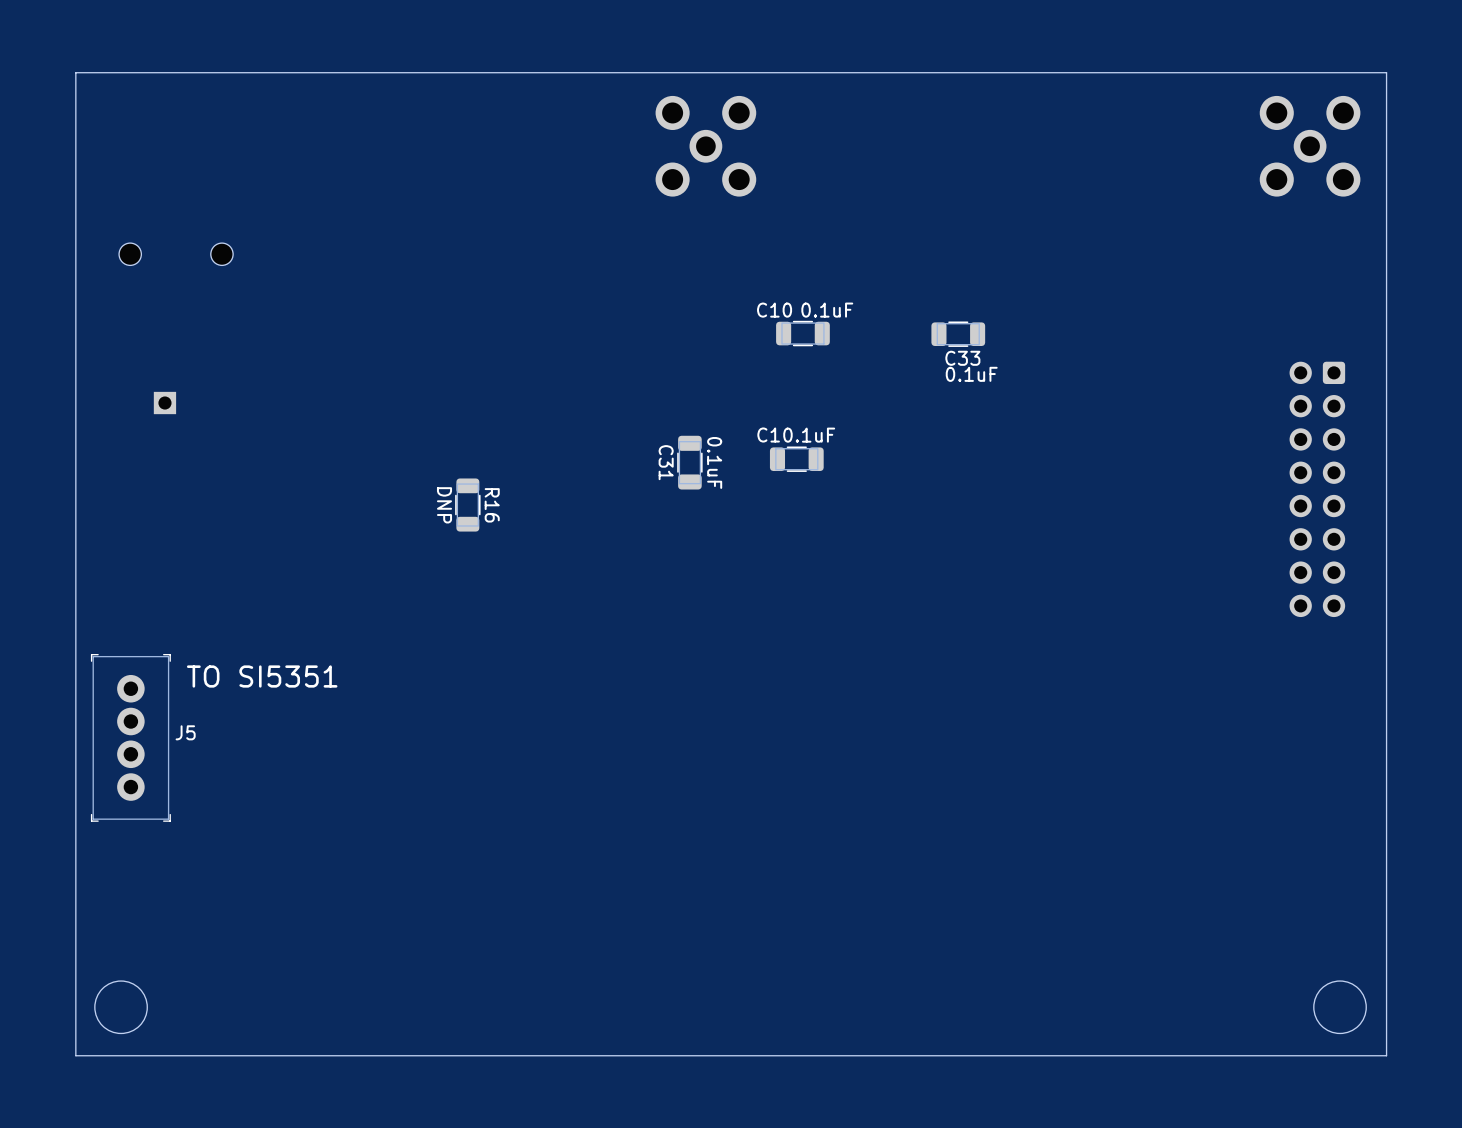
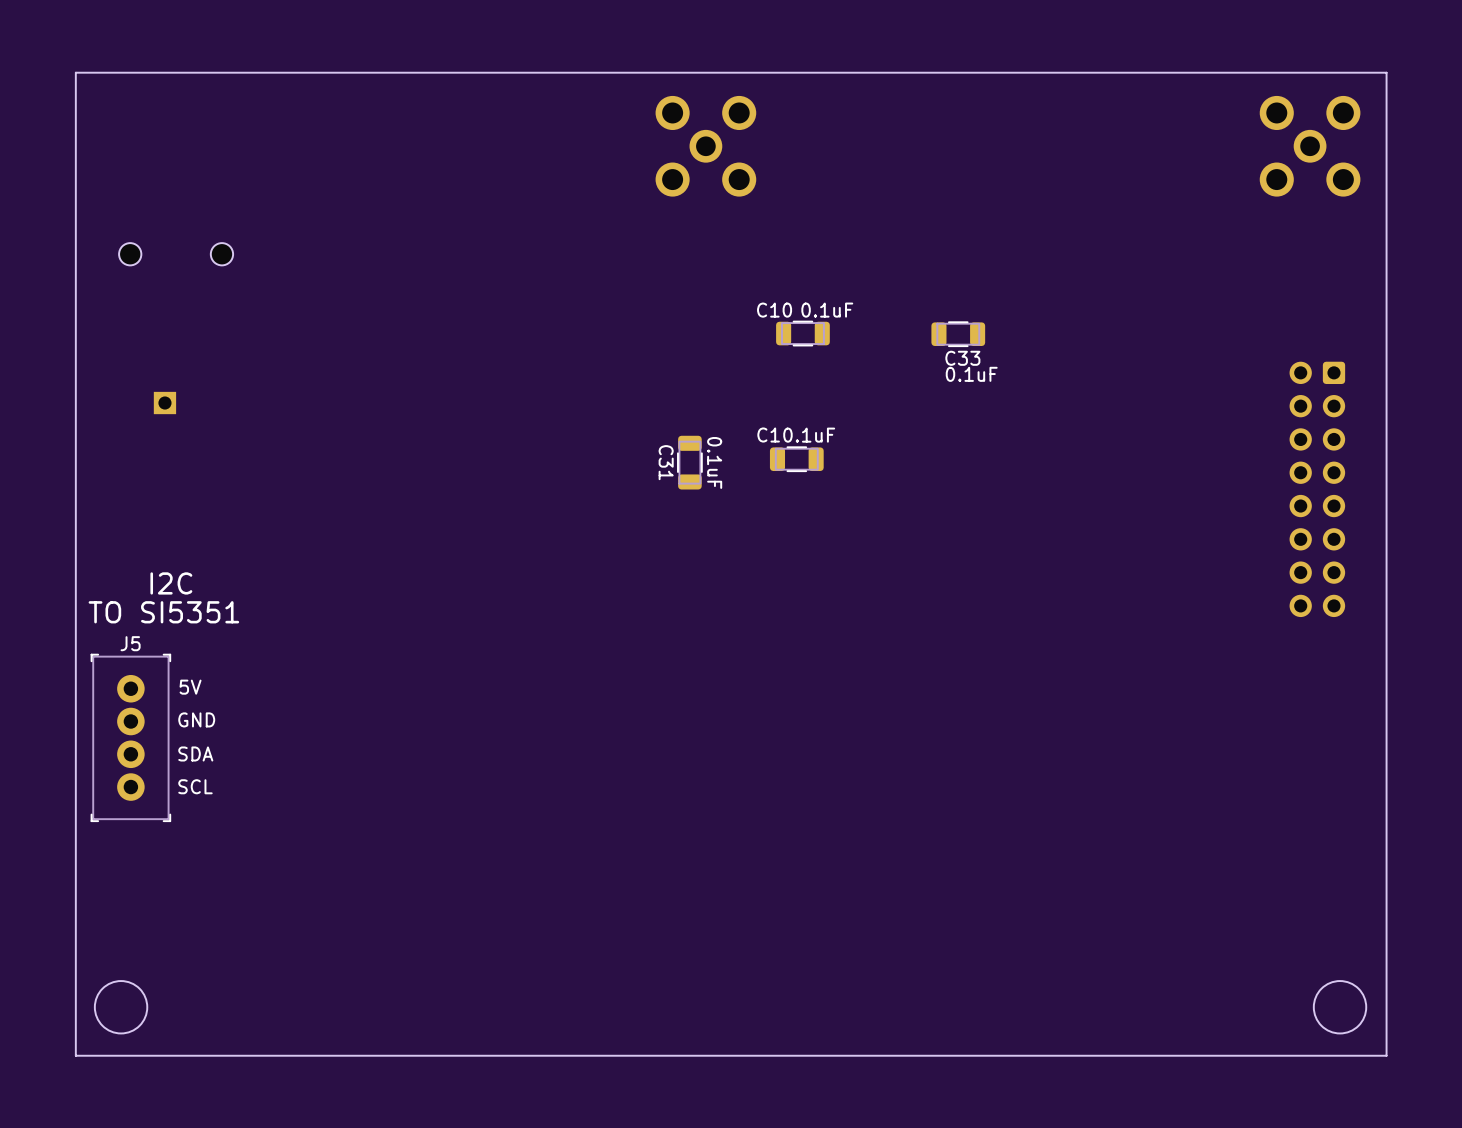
R16: DNP (467, 505) -> none
text: none -> I2C (171, 583)
text: none -> TO SI5351 (163, 612)
text: TO SI5351 (262, 676) -> 5V (190, 687)
text: none -> GND (196, 719)
J5 name position: J5 (185, 732) -> J5 (130, 643)
text: none -> SDA (195, 753)
text: none -> SCL (195, 786)

